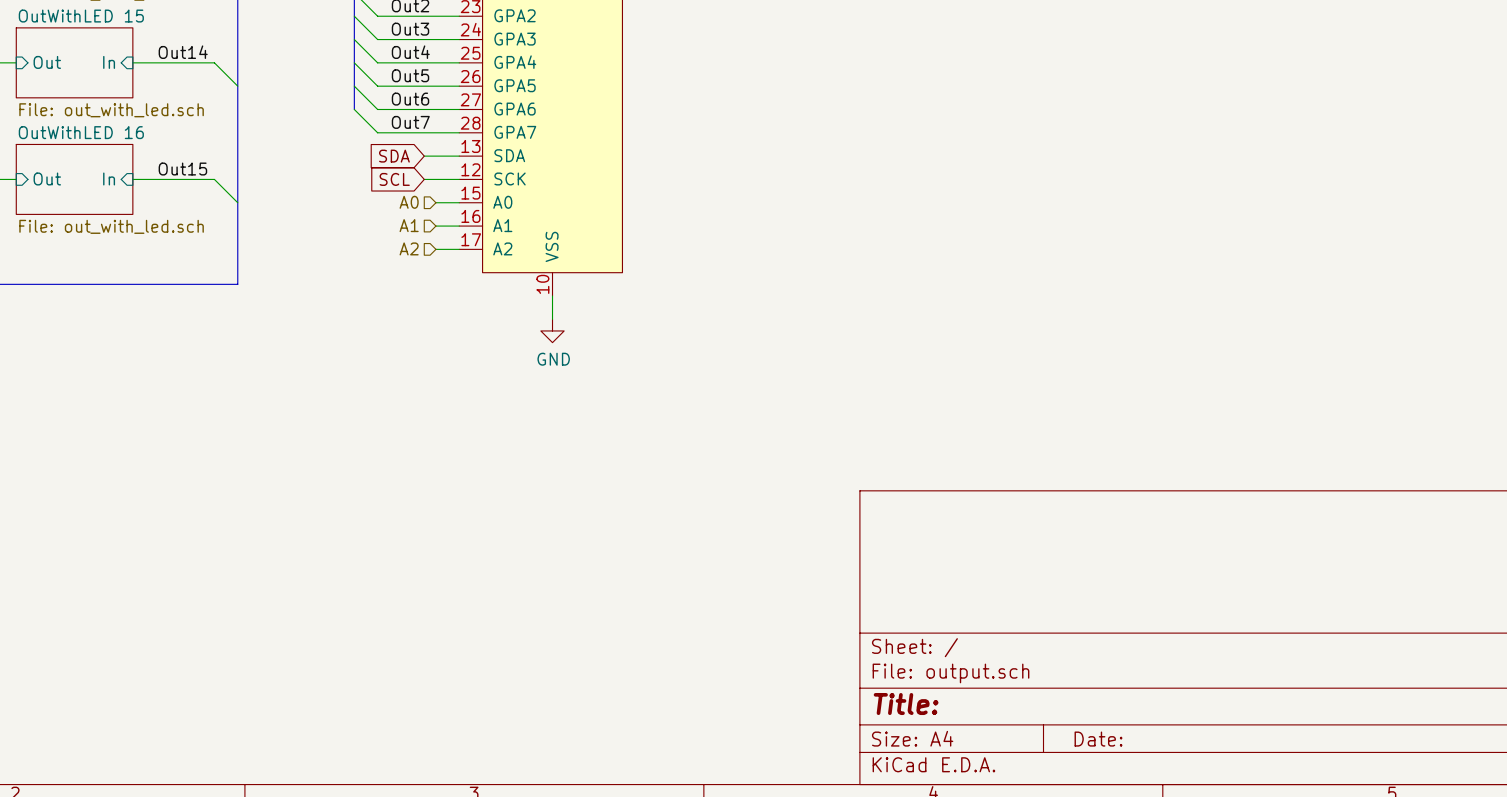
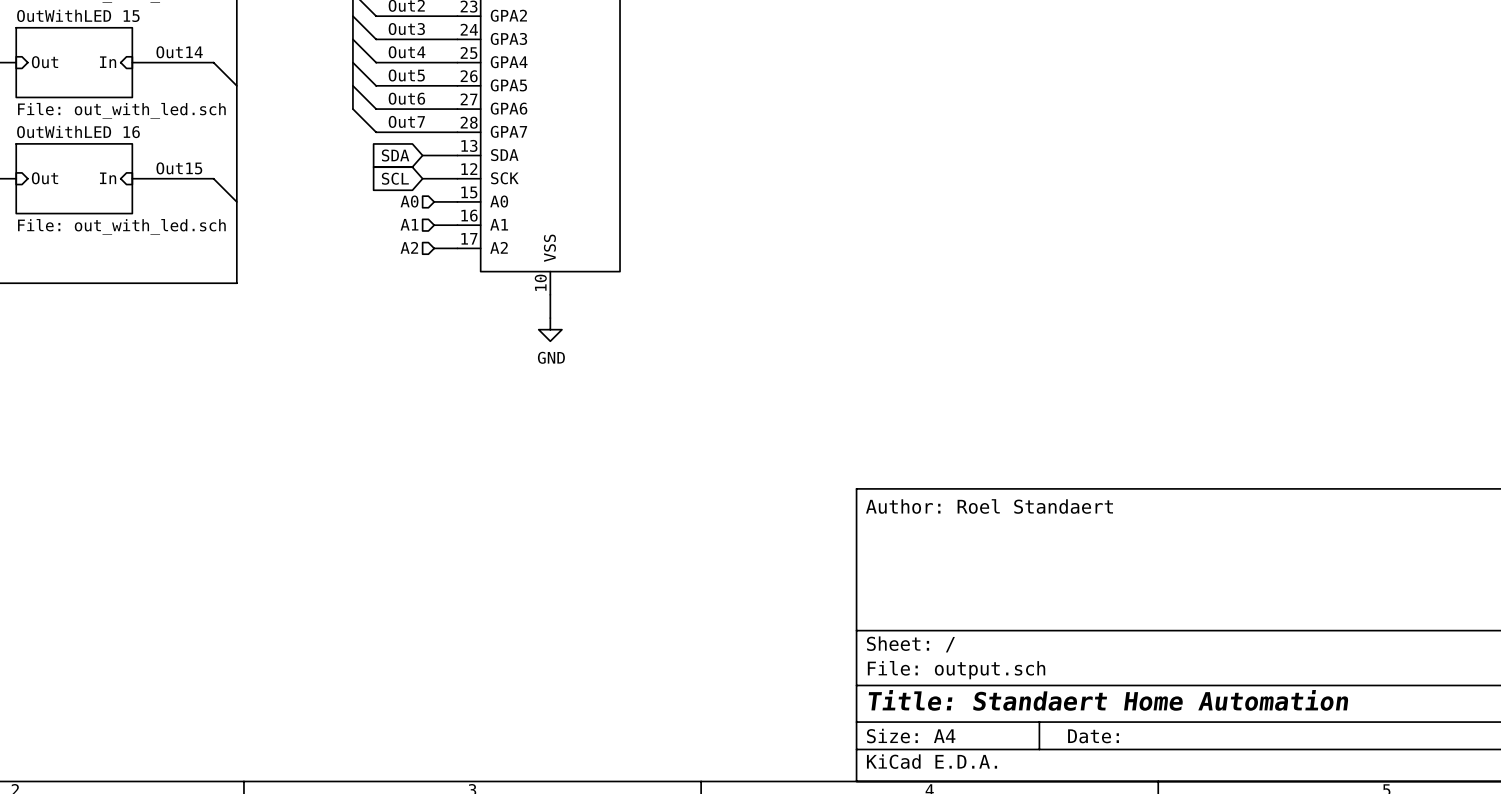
title block: none -> Author: Roel Standaert (989, 506)
title block: Title: (906, 704) -> Title: Standaert Home Automation (1108, 700)

